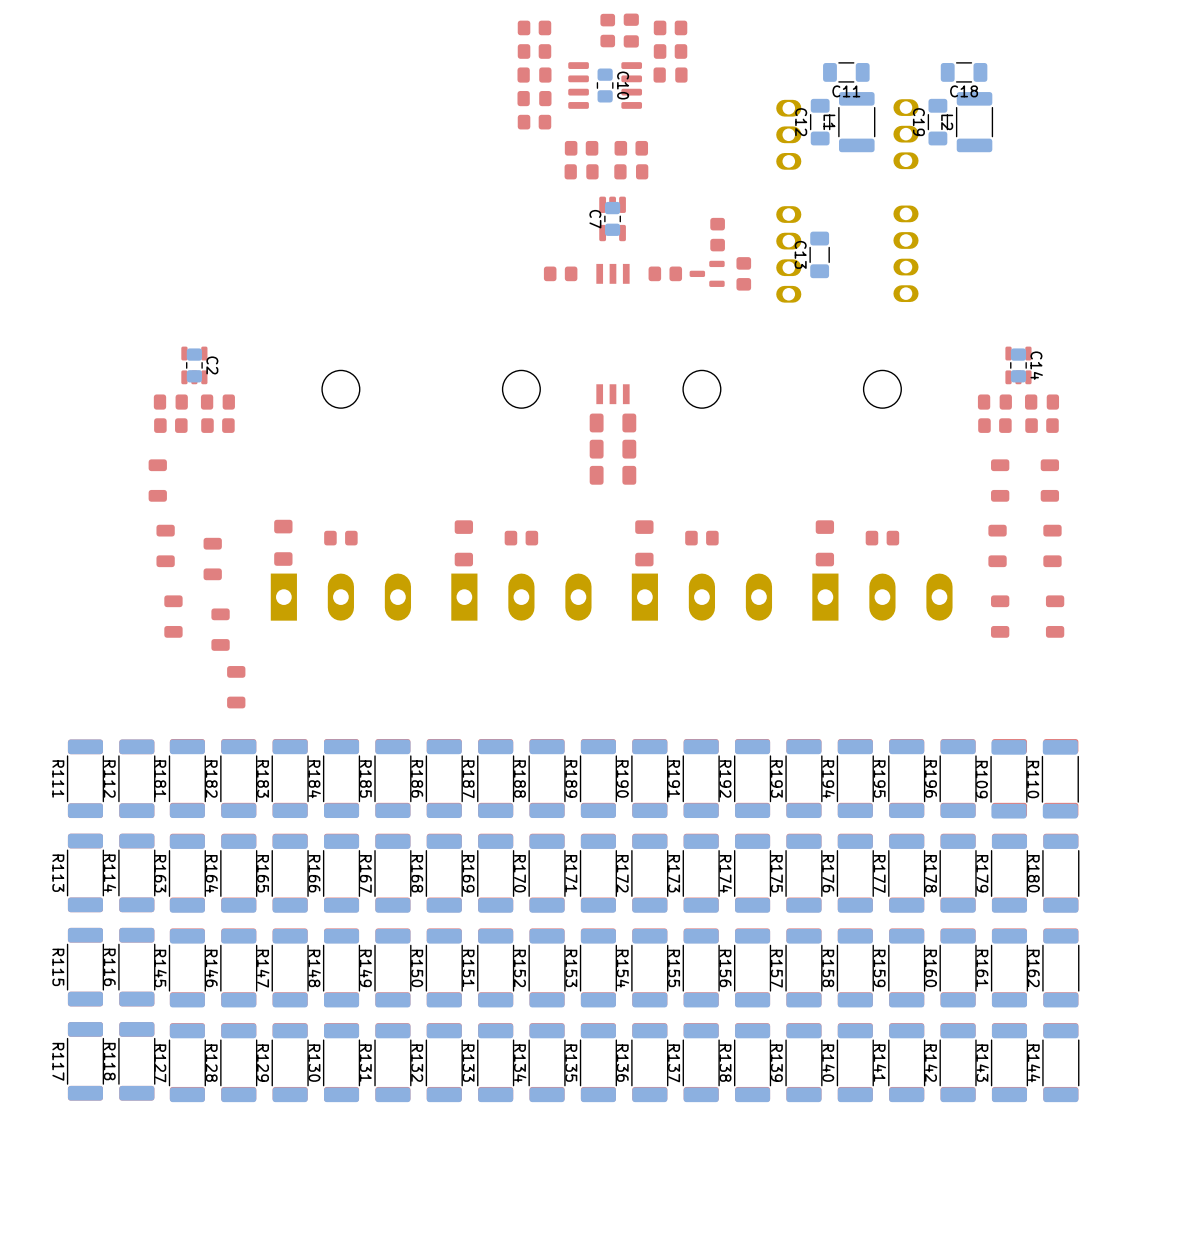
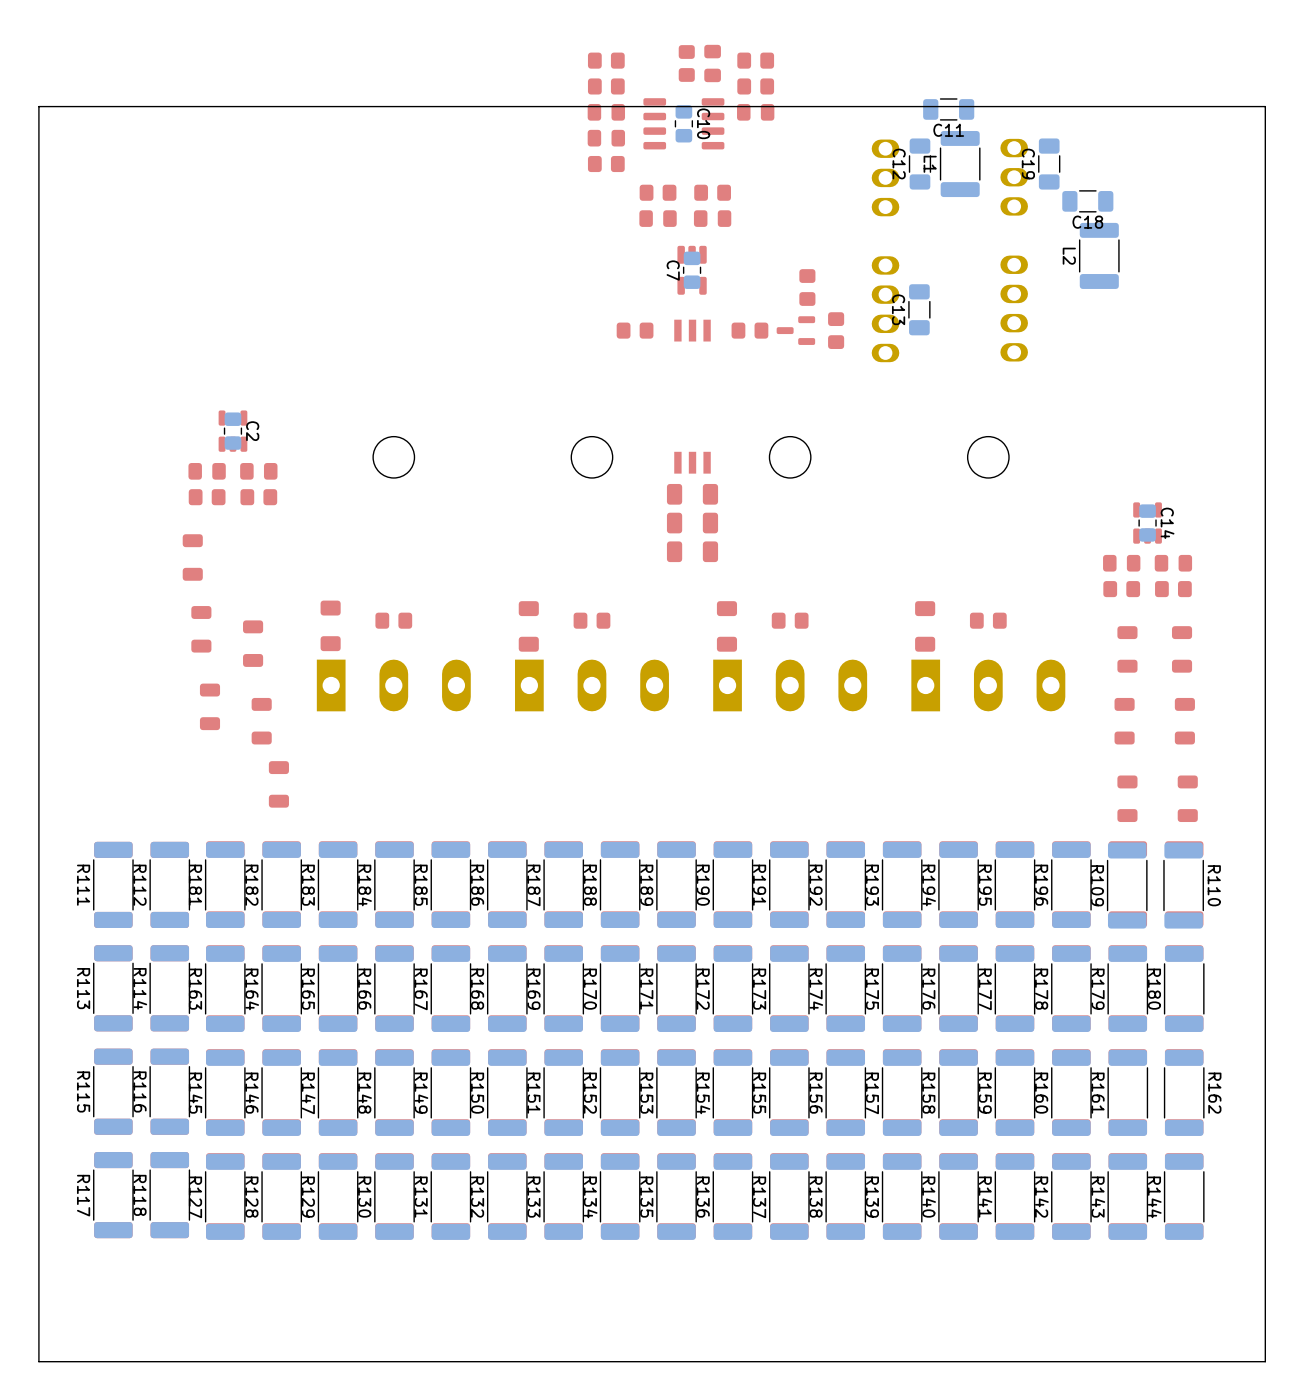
board edge: none -> (1265, 106) (38, 106) (38, 1361) (1265, 1361) (1265, 106)
C18 position: (964, 72) -> (1087, 201)
L2 position: (974, 122) -> (1099, 255)
C14 position: (1018, 365) -> (1147, 523)
part position: (1018, 365) -> (1147, 523)
part: (994, 402) -> none
part: (1042, 402) -> none
part: (994, 425) -> none
part: (1042, 425) -> none
part footprint: [991, 459, 1010, 502] -> [1103, 554, 1141, 572]
part footprint: [1040, 459, 1060, 502] -> [1154, 554, 1193, 572]
part: none -> (1121, 589)
part: none -> (1173, 589)
part position: (997, 545) -> (1127, 649)
part position: (1052, 545) -> (1182, 649)
part position: (1000, 616) -> (1124, 721)
part position: (1055, 616) -> (1184, 721)
part: none -> (1127, 798)
part: none -> (1187, 798)
R110 name position: R110 (1033, 779) -> R110 (1214, 885)
R162 name position: R162 (1033, 968) -> R162 (1214, 1093)

